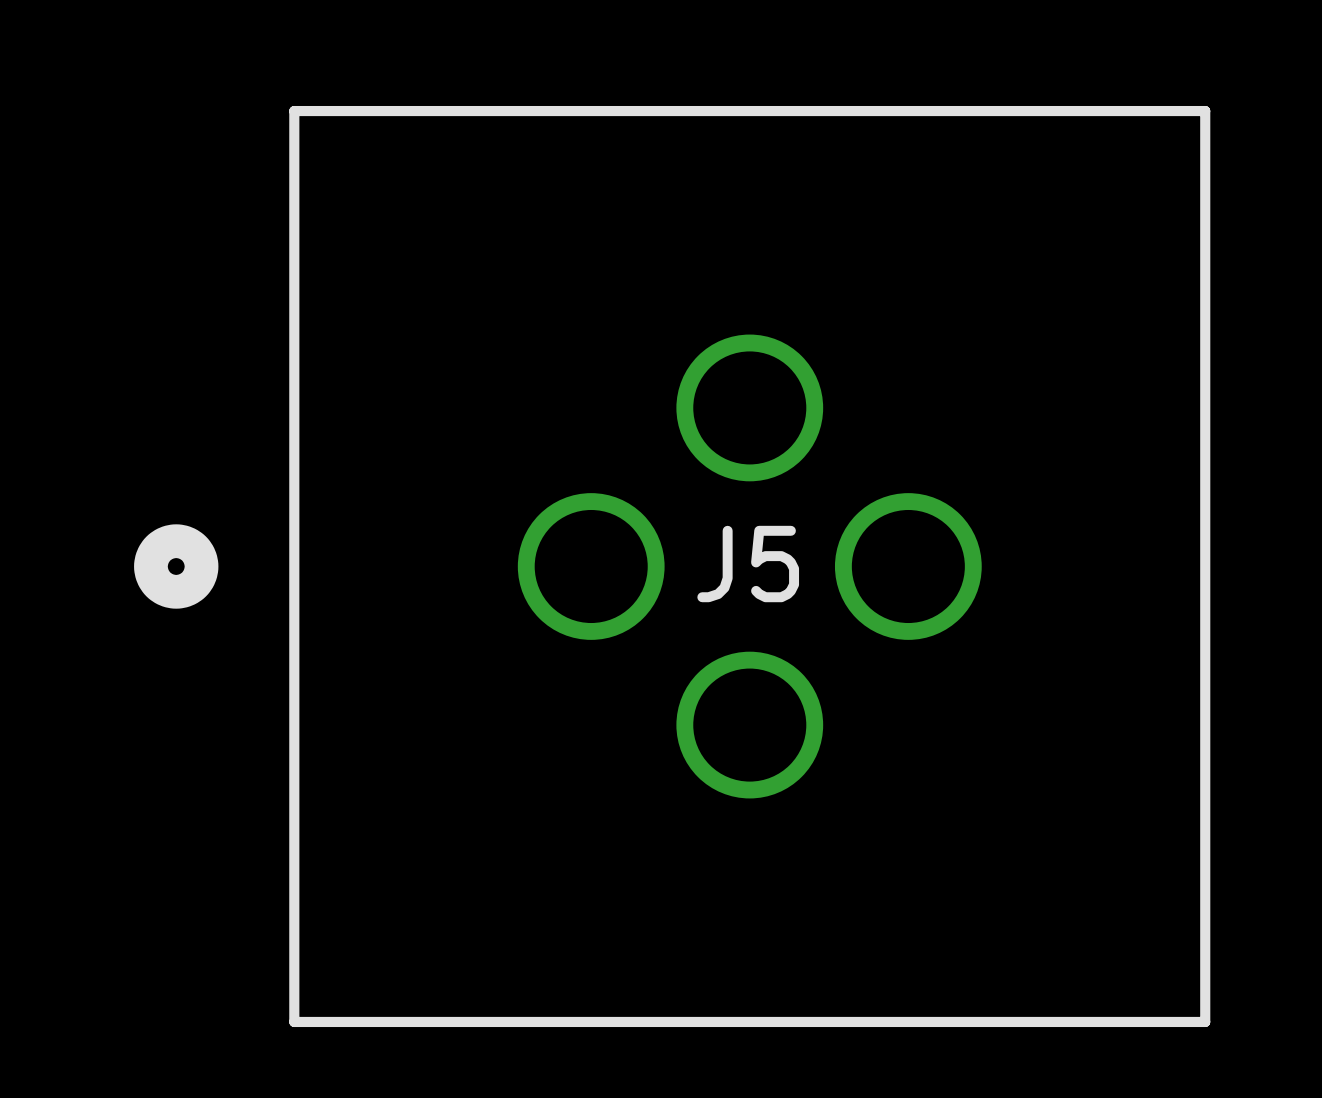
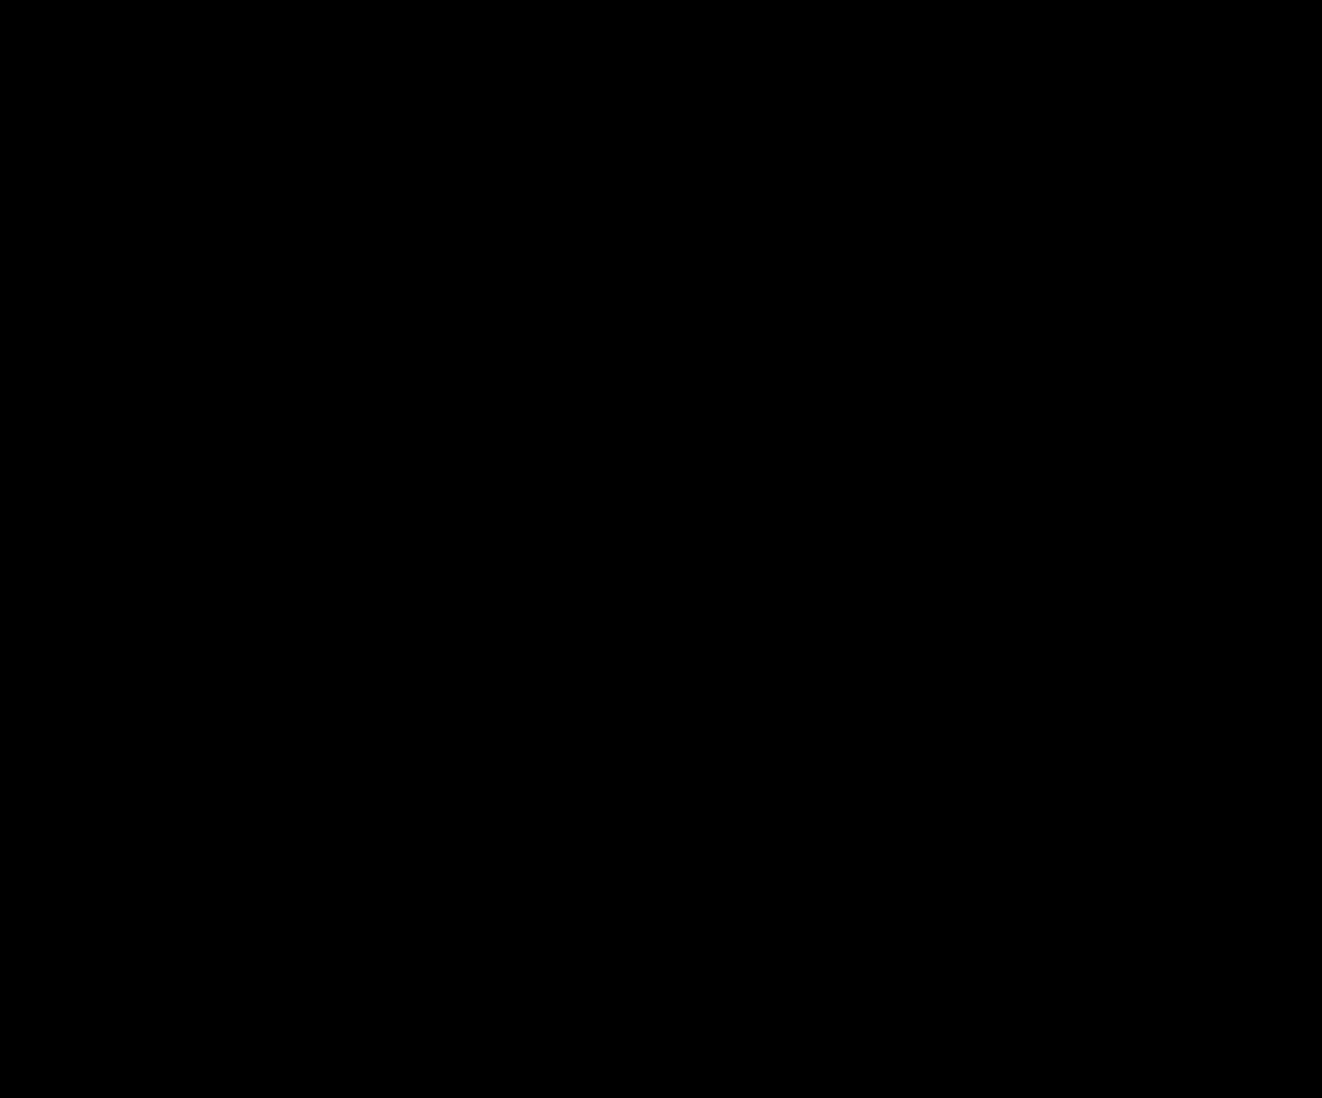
J5: (672, 566) -> none

